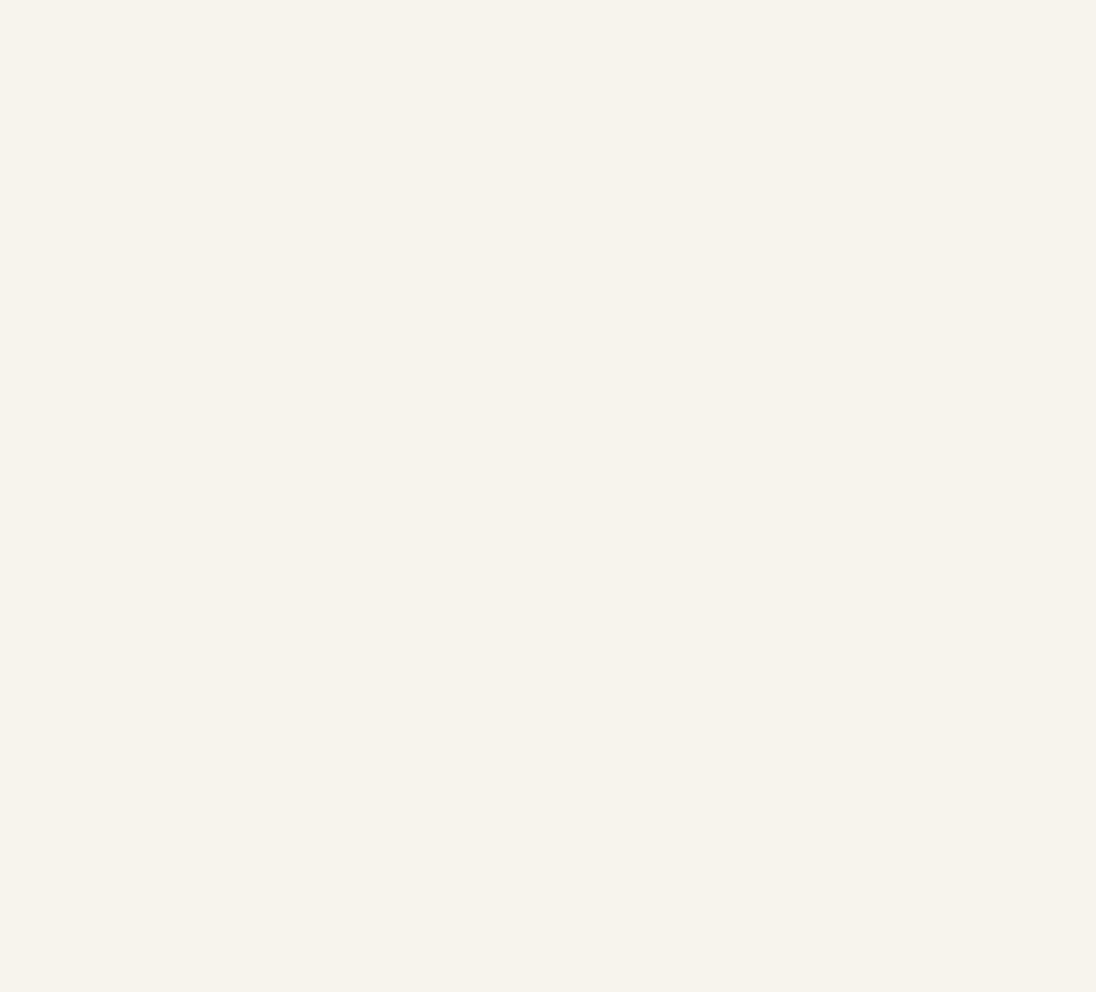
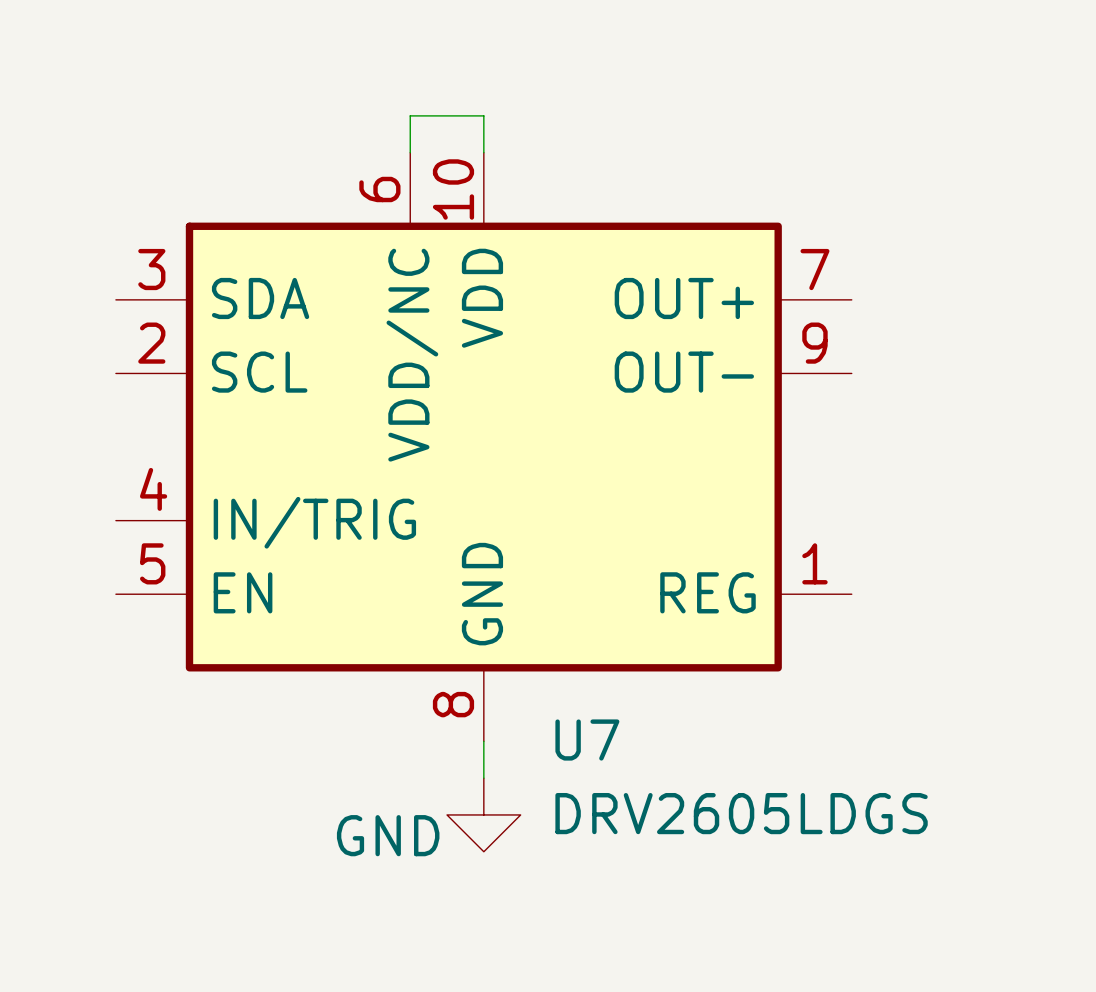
wire: none -> (410, 152) (410, 115) (483, 115) (483, 152)
U7: none -> DRV2605LDGS (483, 447)
wire: none -> (483, 741) (483, 778)
power symbol: none -> GND (483, 814)

